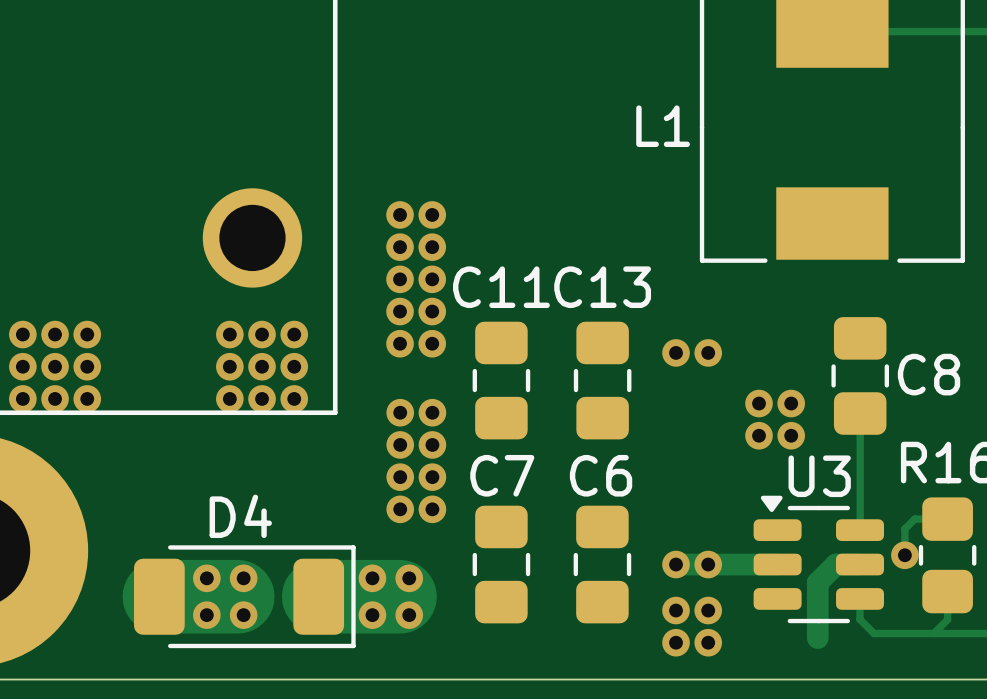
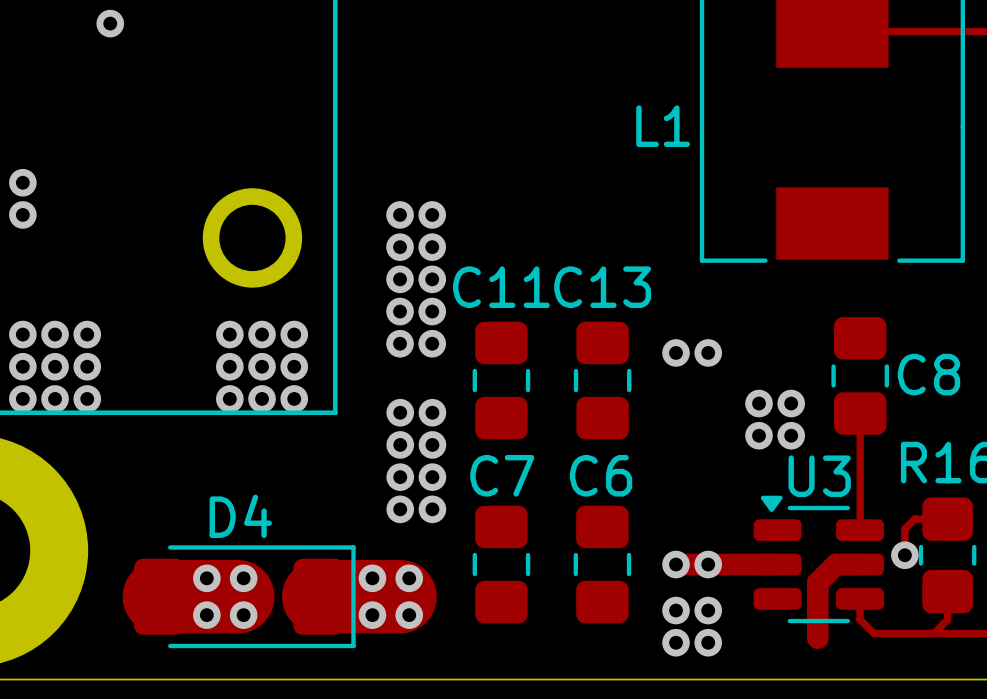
via: none -> (110, 23)
via: none -> (22, 182)
via: none -> (22, 214)

